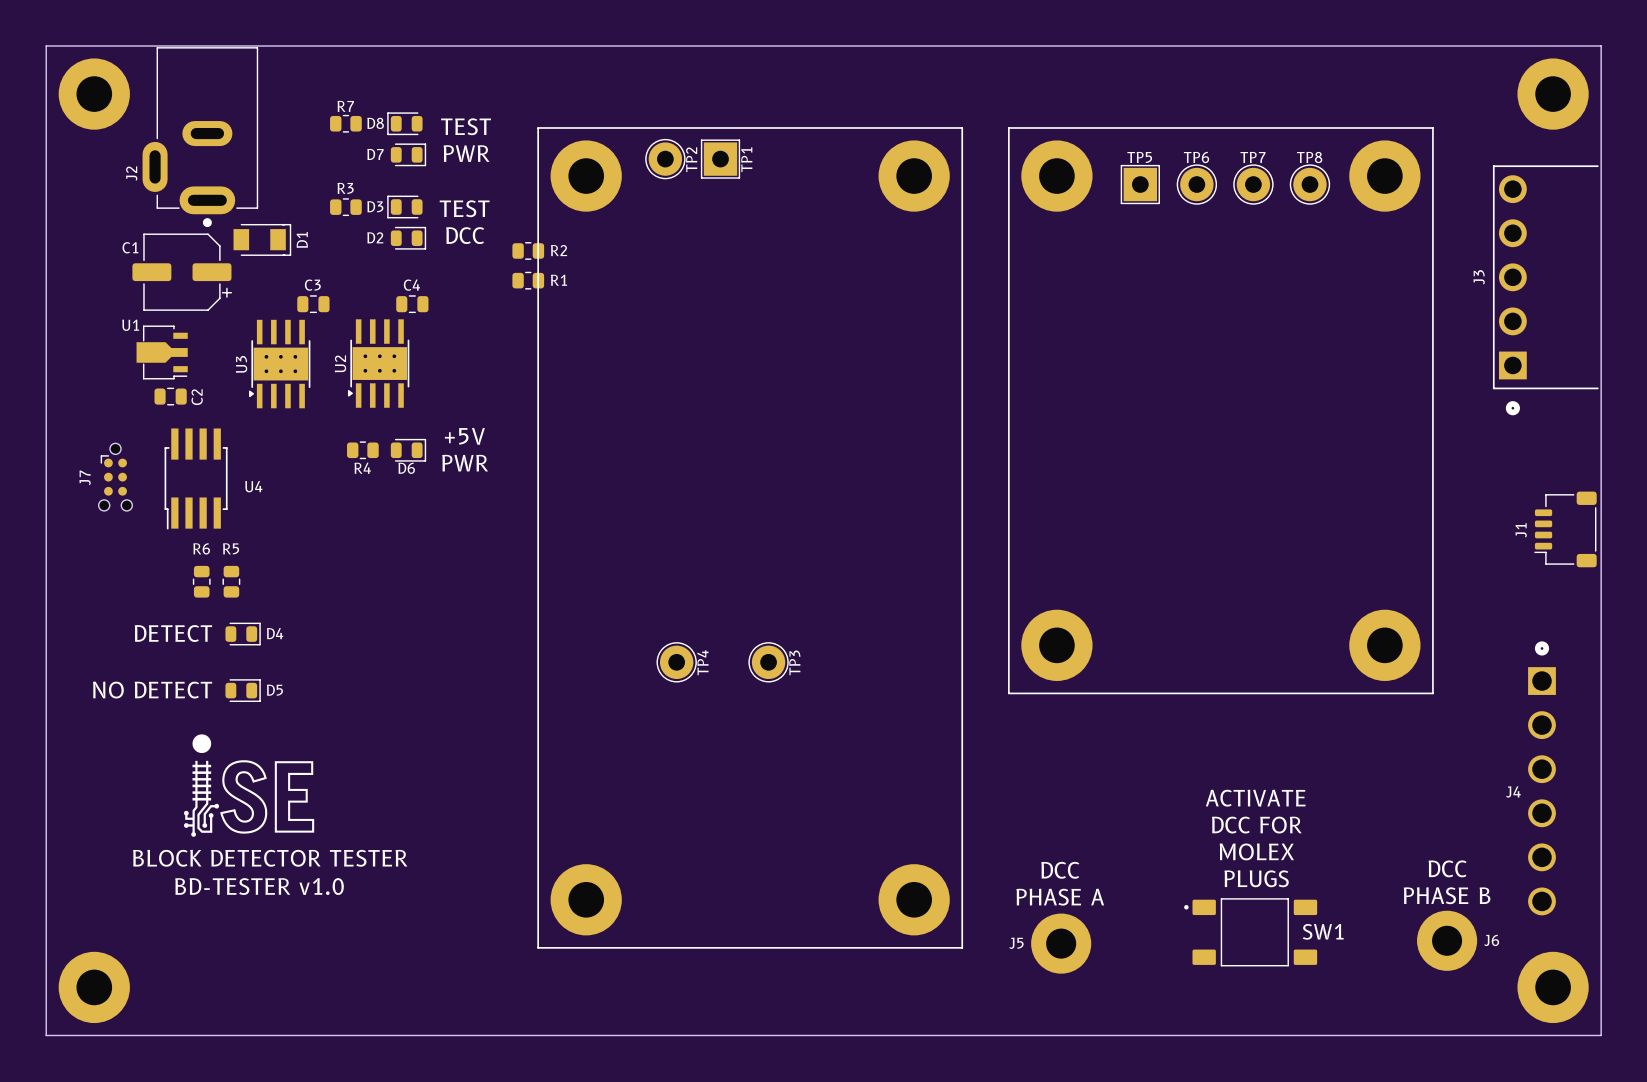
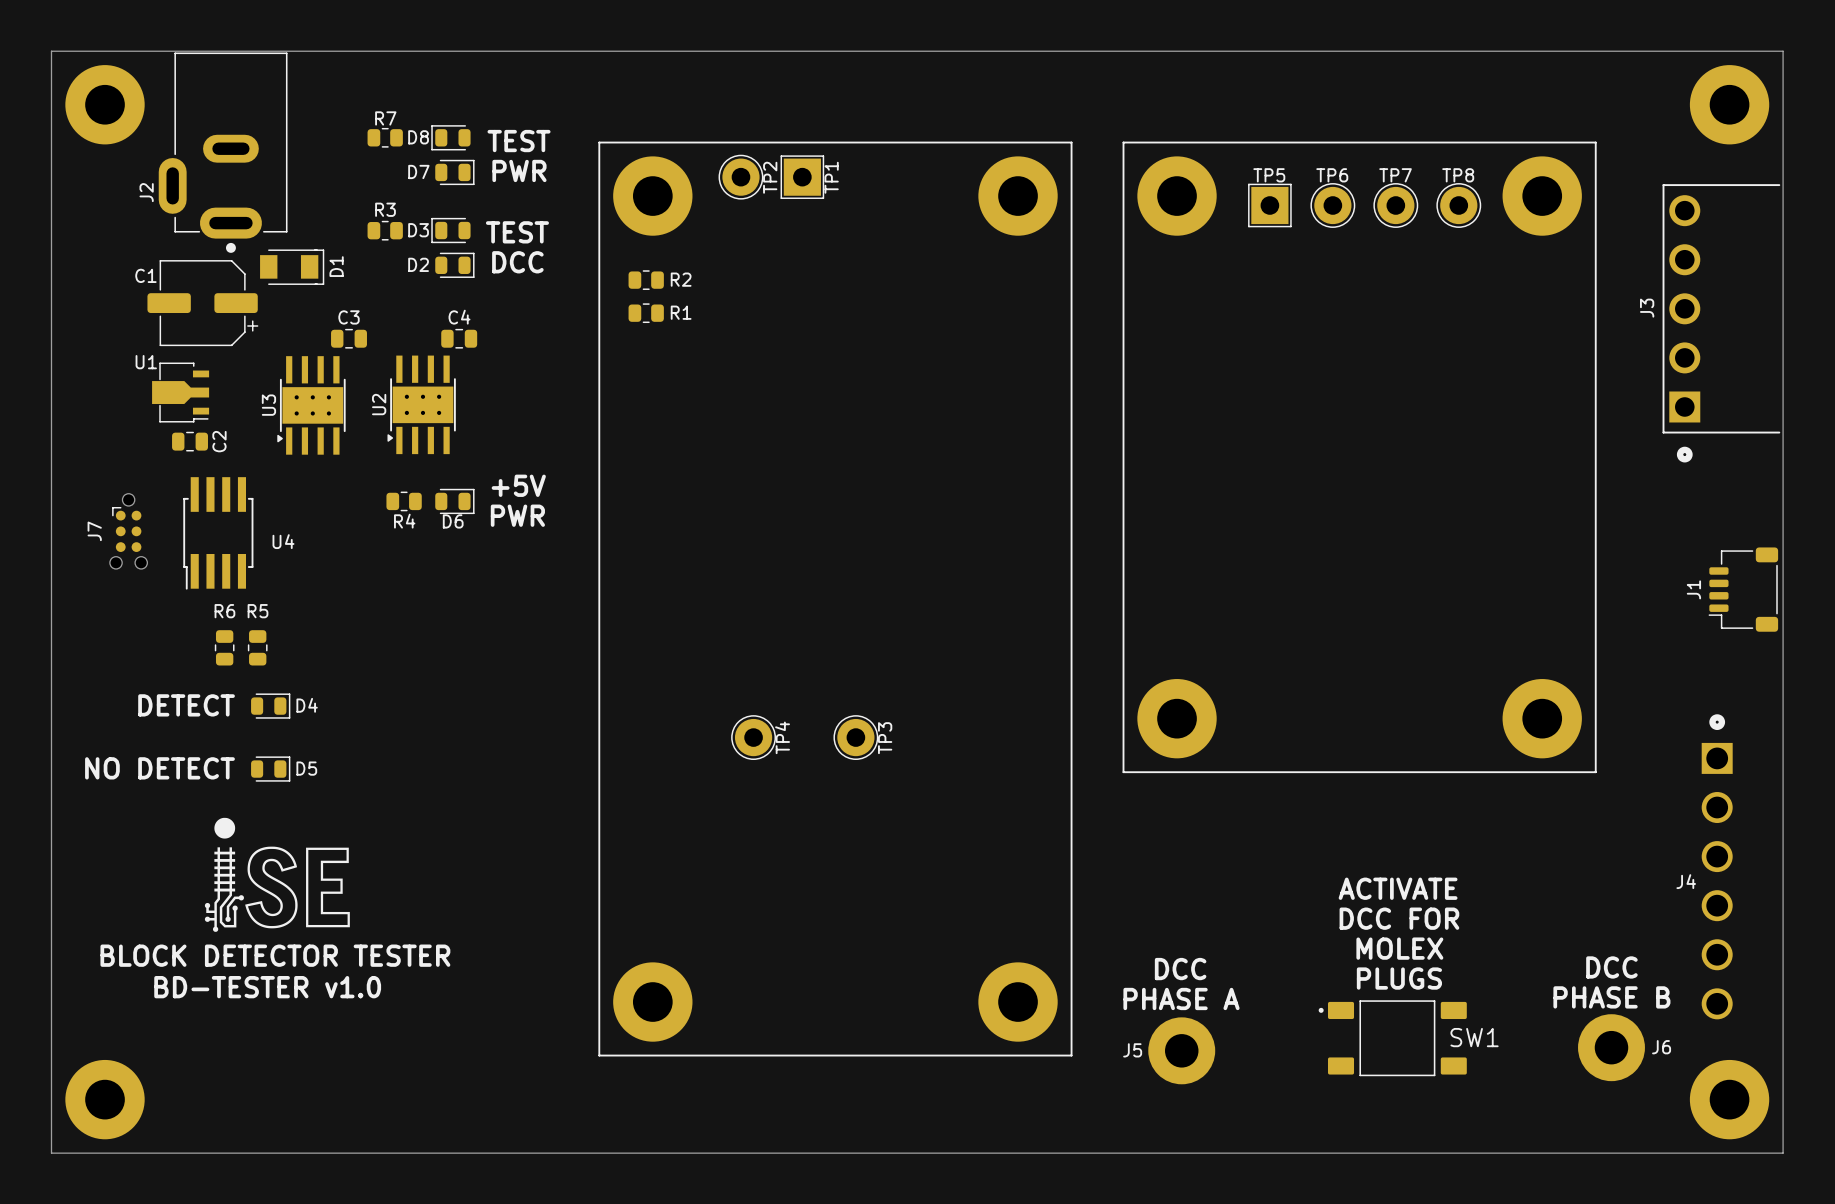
R2 position: (528, 250) -> (646, 280)
R1 position: (528, 280) -> (646, 313)

